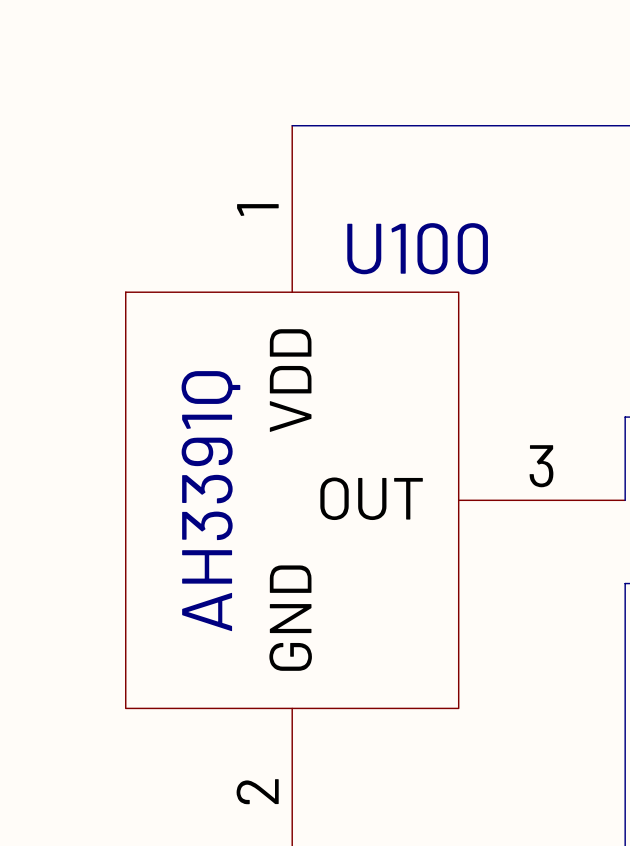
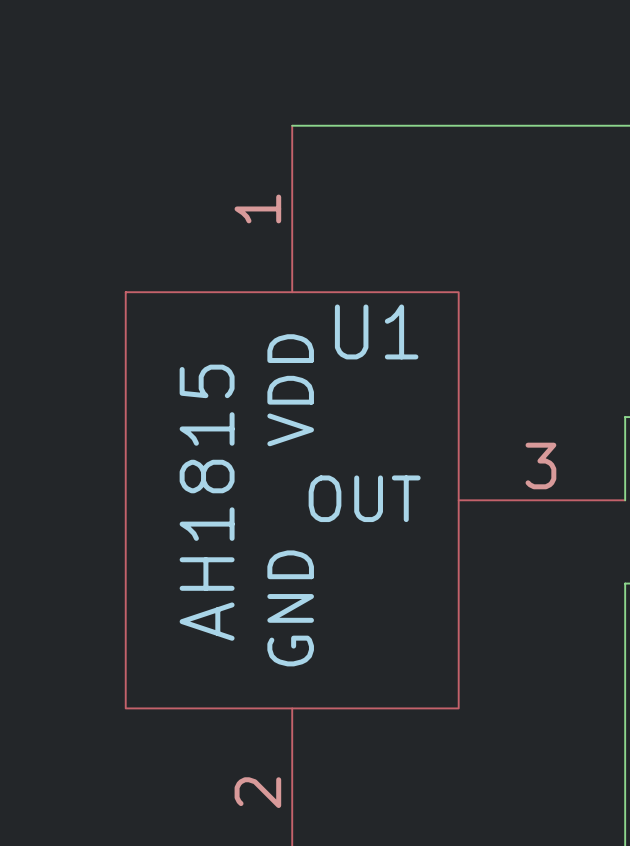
U100 name: U100 (417, 248) -> U1 (376, 331)
U100 value: AH3391Q (210, 501) -> AH1815 (207, 502)

